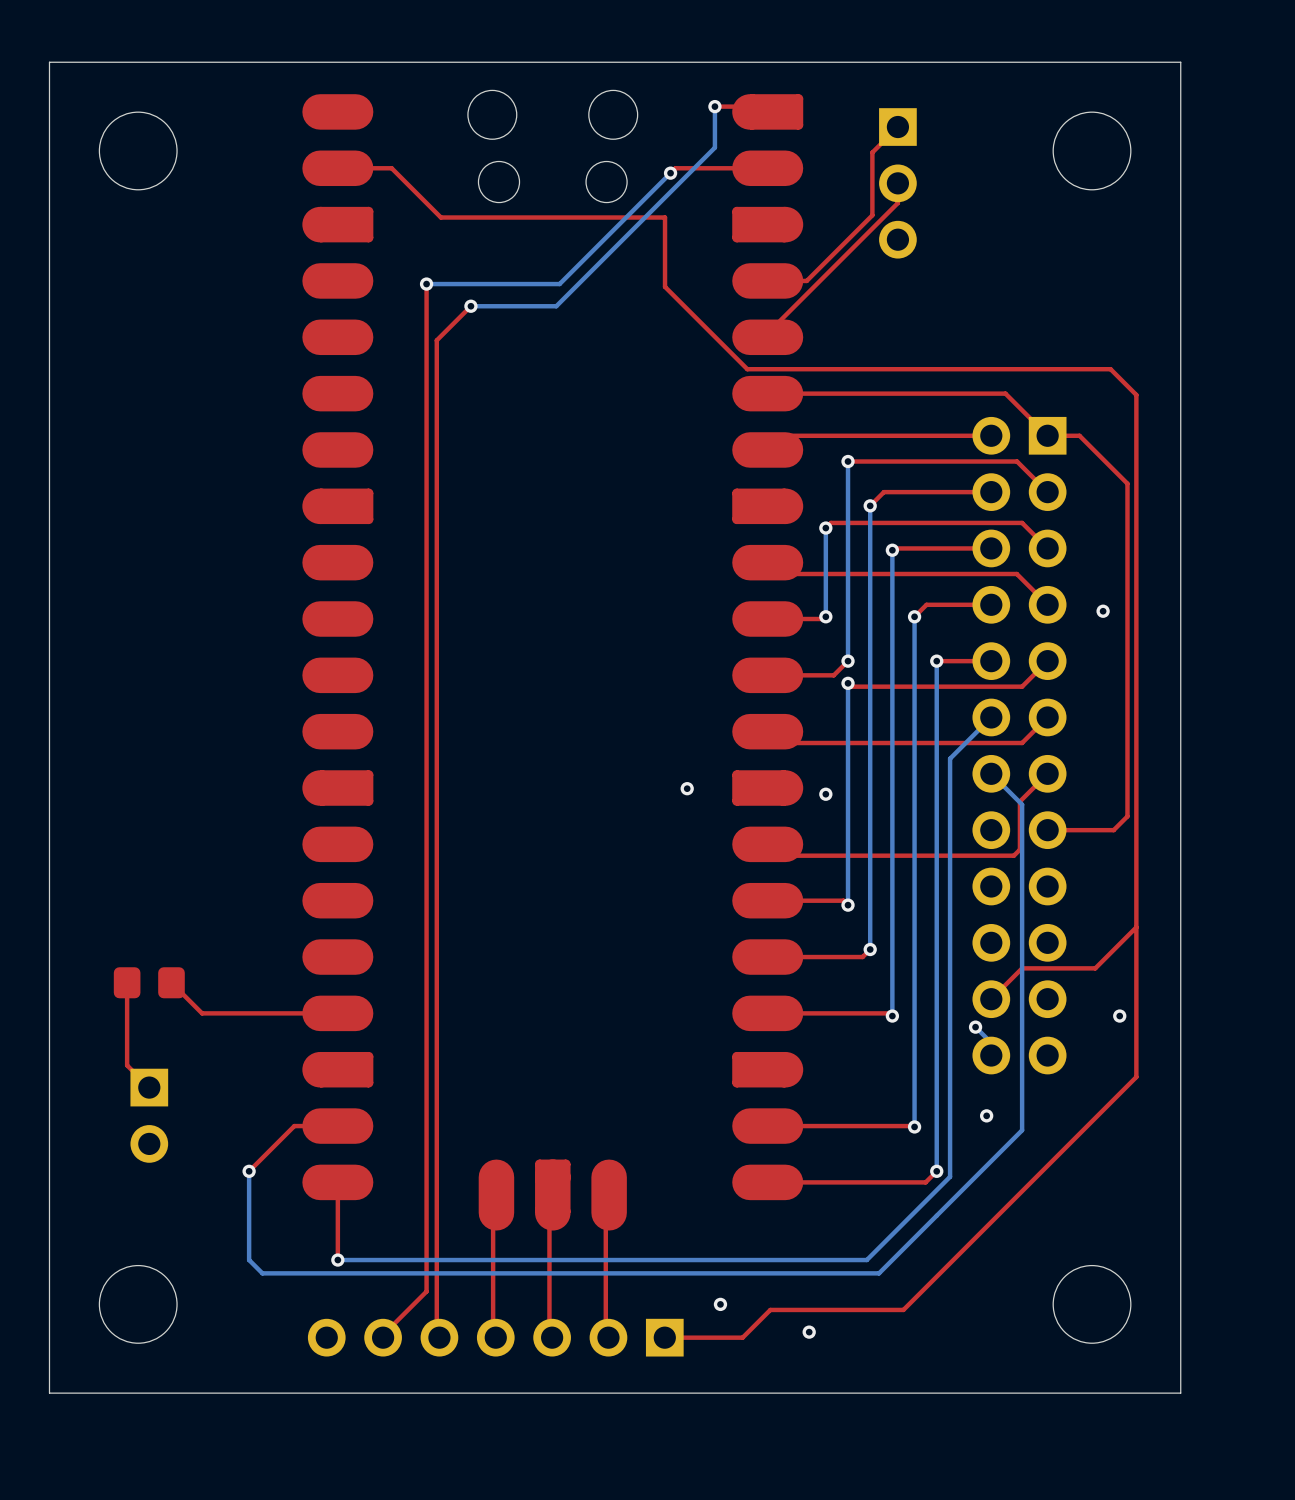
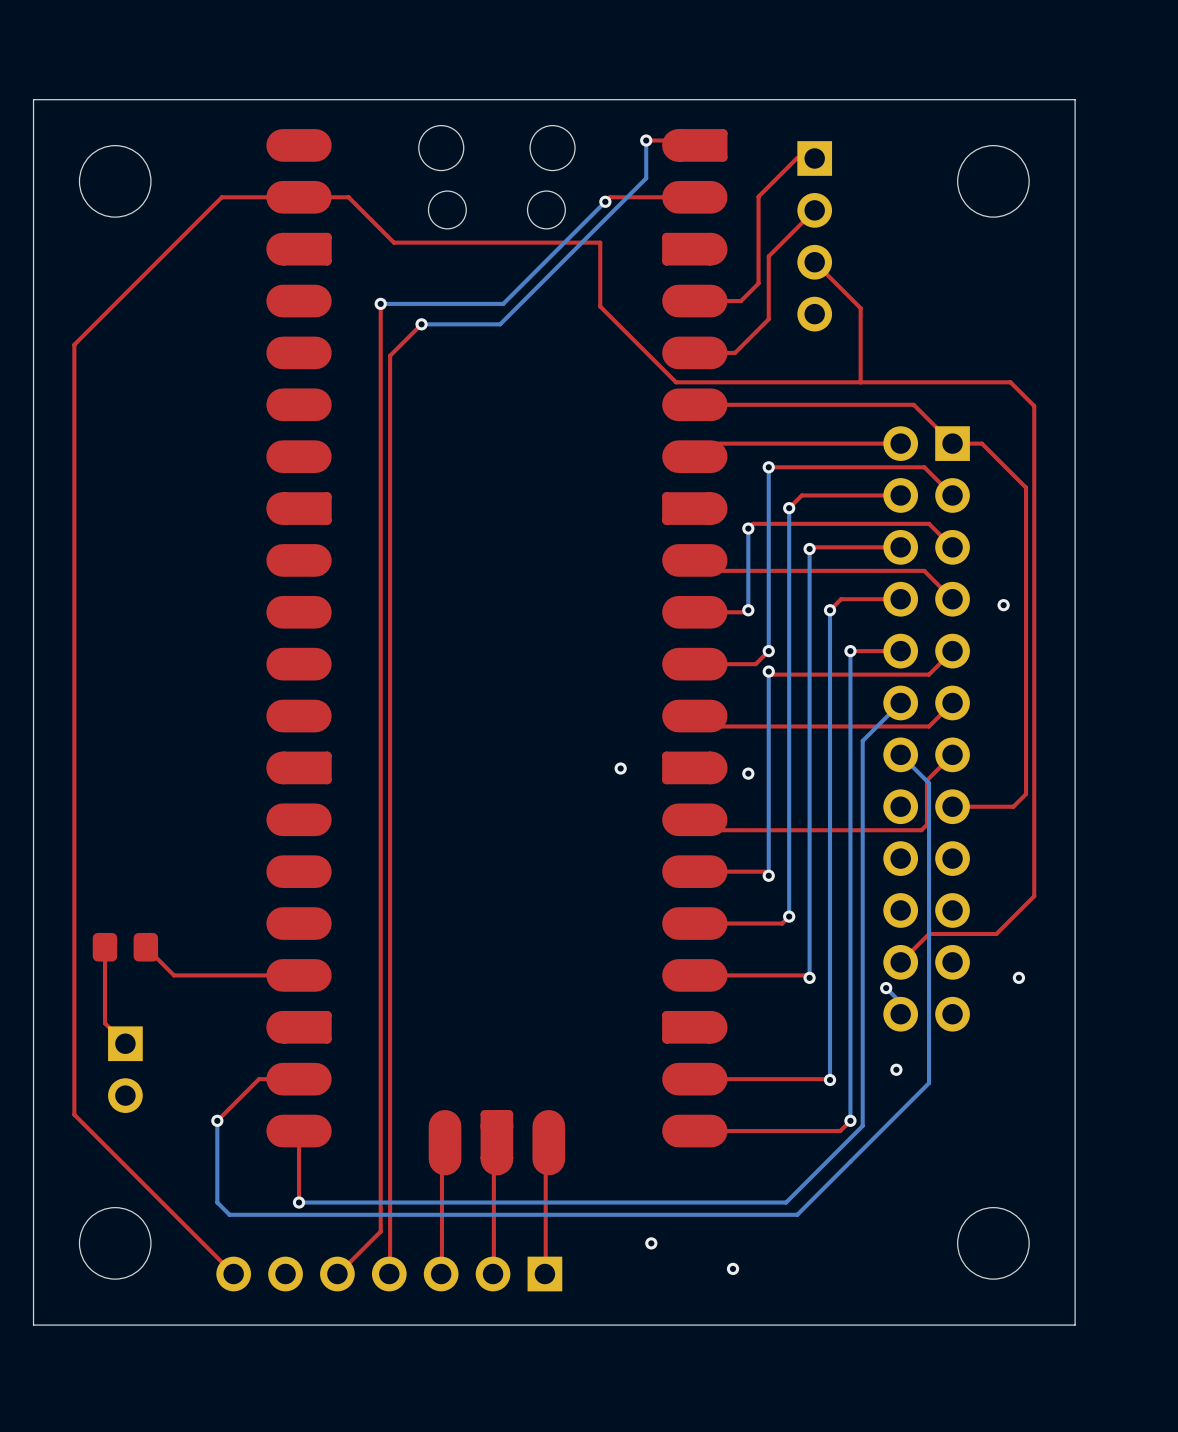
top track: (897, 127) (872, 152) (872, 215) (806, 280) -> (814, 158) (796, 158) (758, 196) (758, 283) (740, 301) (730, 301)
top track: none -> (299, 197) (221, 197) (74, 344) (74, 1114) (233, 1274)
top track: (897, 183) (897, 203) (767, 333) -> (814, 210) (768, 256) (768, 319) (735, 352) (694, 352)
part: (897, 183) -> none
part: none -> (814, 236)
top track: none -> (814, 262) (860, 308) (860, 382)
top track: (1136, 927) (1136, 1077) (903, 1309) (770, 1309) (742, 1337) (664, 1337) -> none
part position: (495, 1337) -> (389, 1274)

